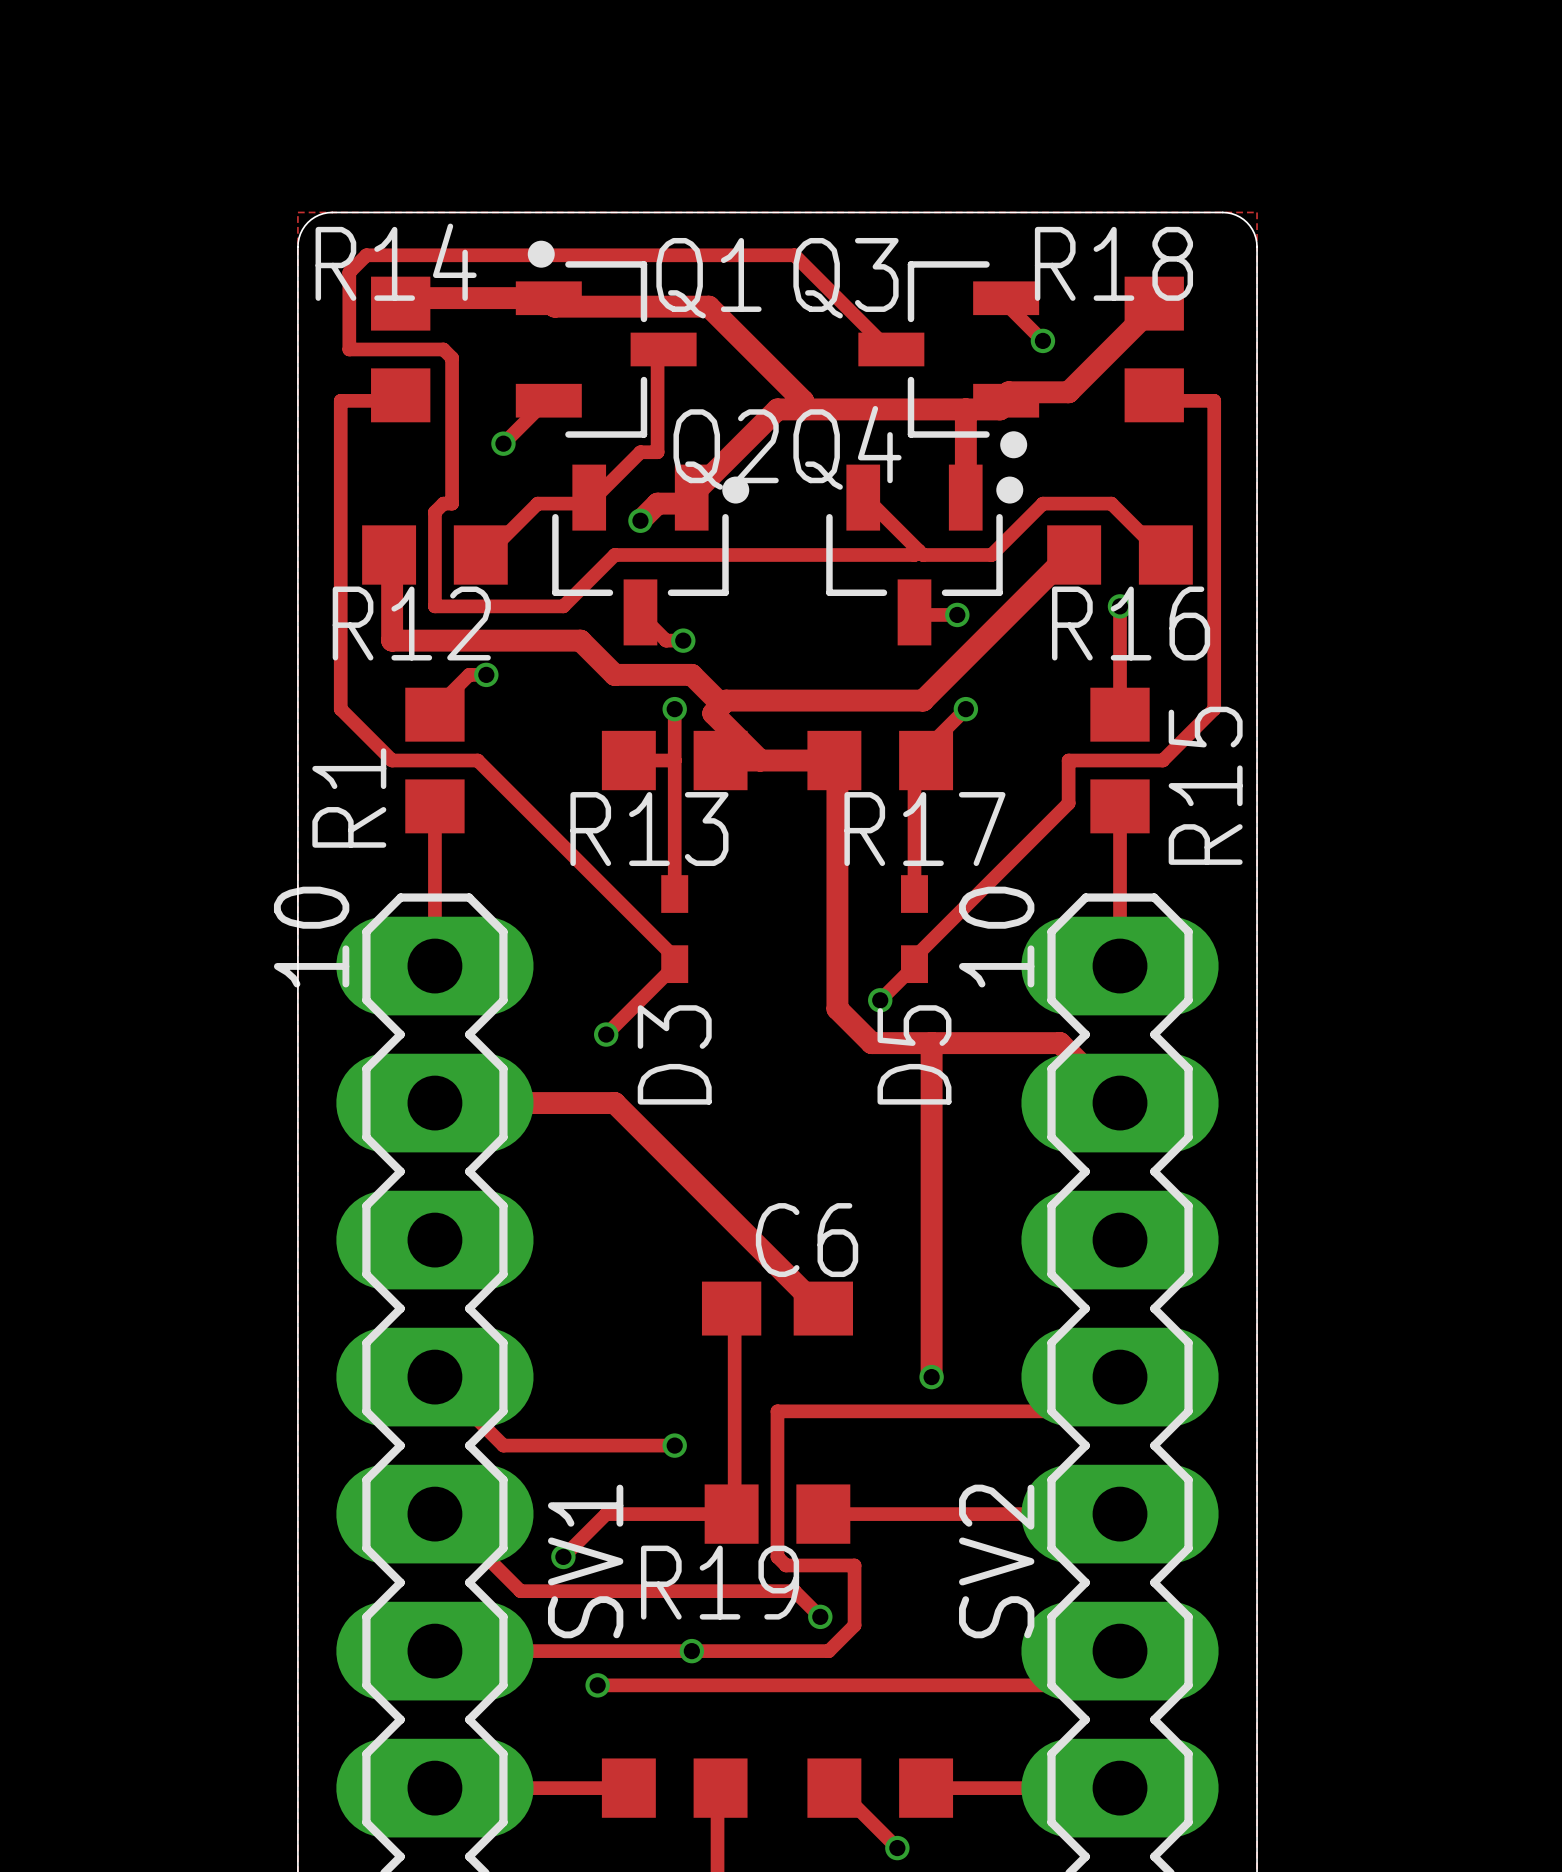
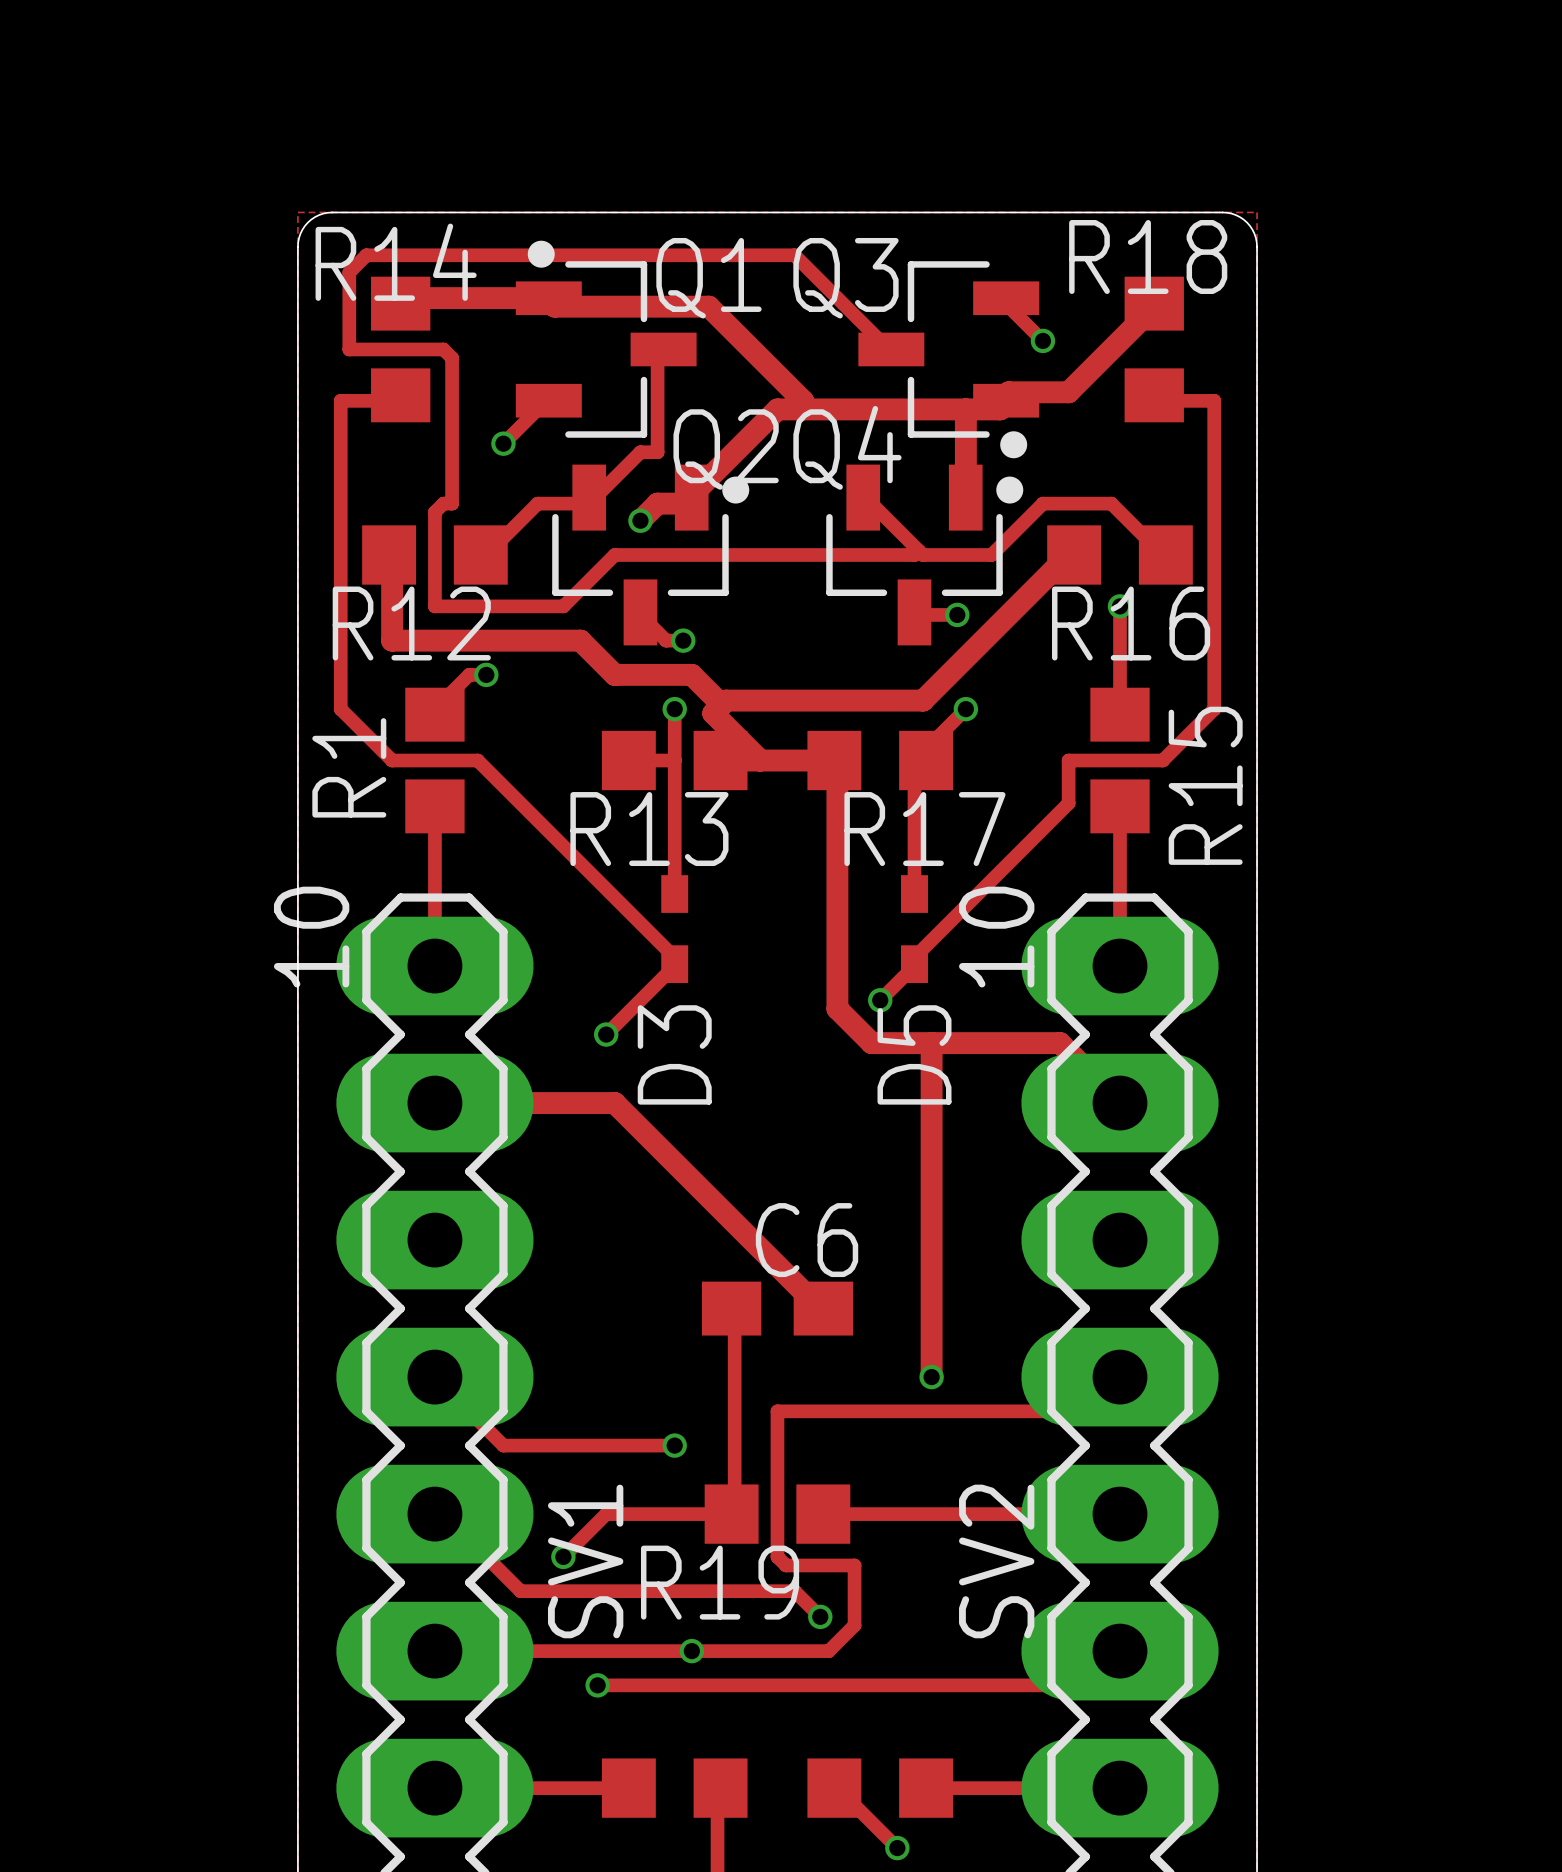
R18 name position: R18 (1113, 263) -> R18 (1148, 257)
R1 name position: R1 (349, 798) -> R1 (349, 767)

